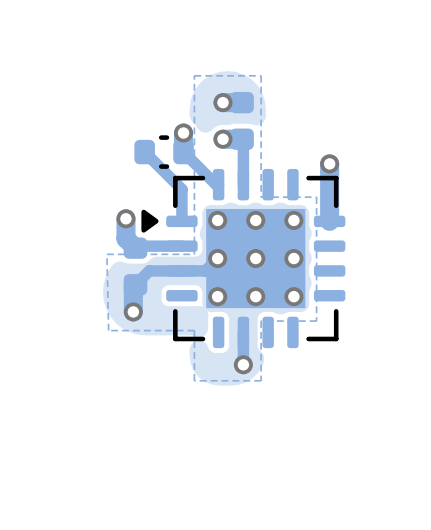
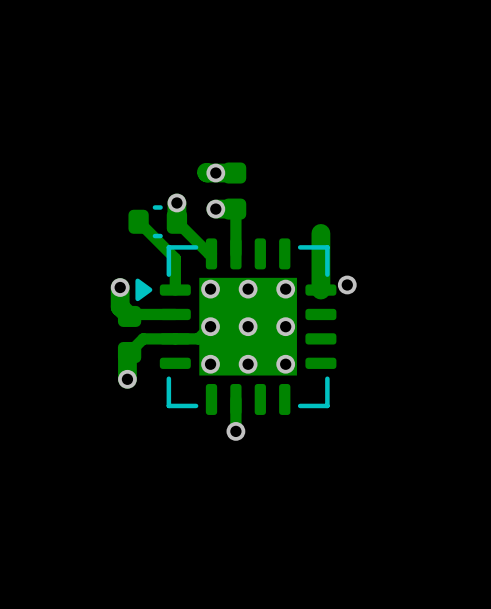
zone outline: (261, 75) (194, 75) (194, 254) (106, 254) (108, 330) (194, 330) (194, 380) (261, 380) (261, 321) (316, 321) (316, 197) (261, 197) (261, 75) -> none
track: none -> (206, 172) (215, 173)
via position: (329, 163) -> (347, 284)

